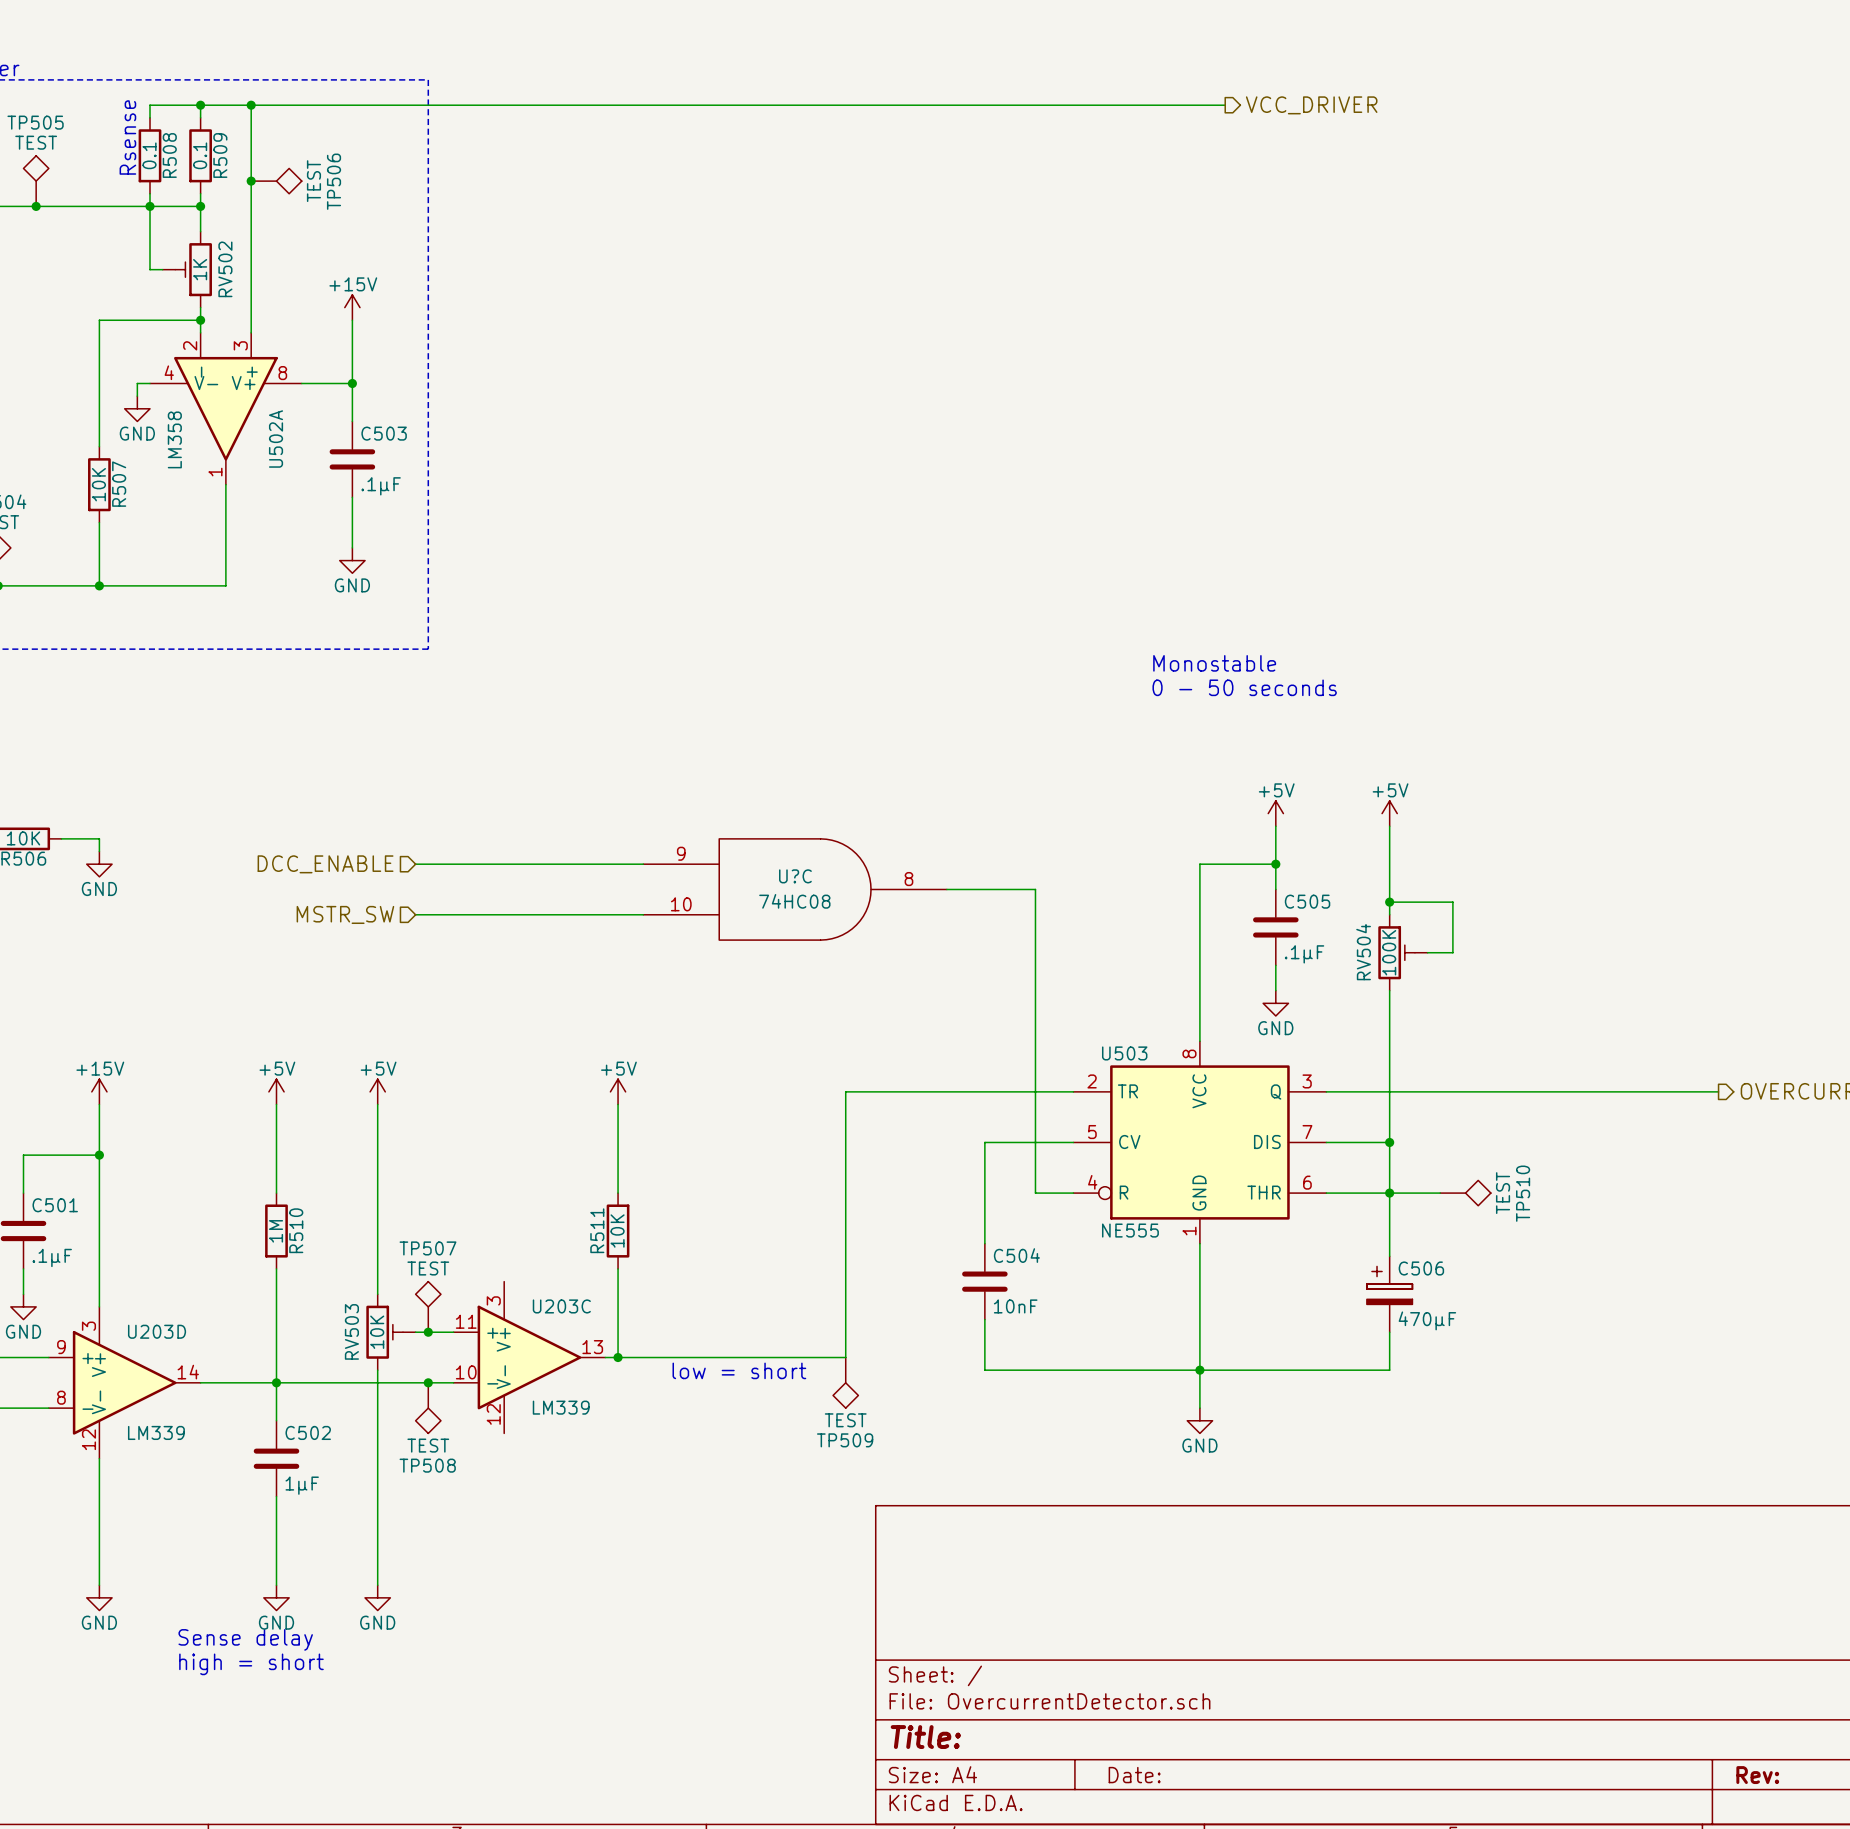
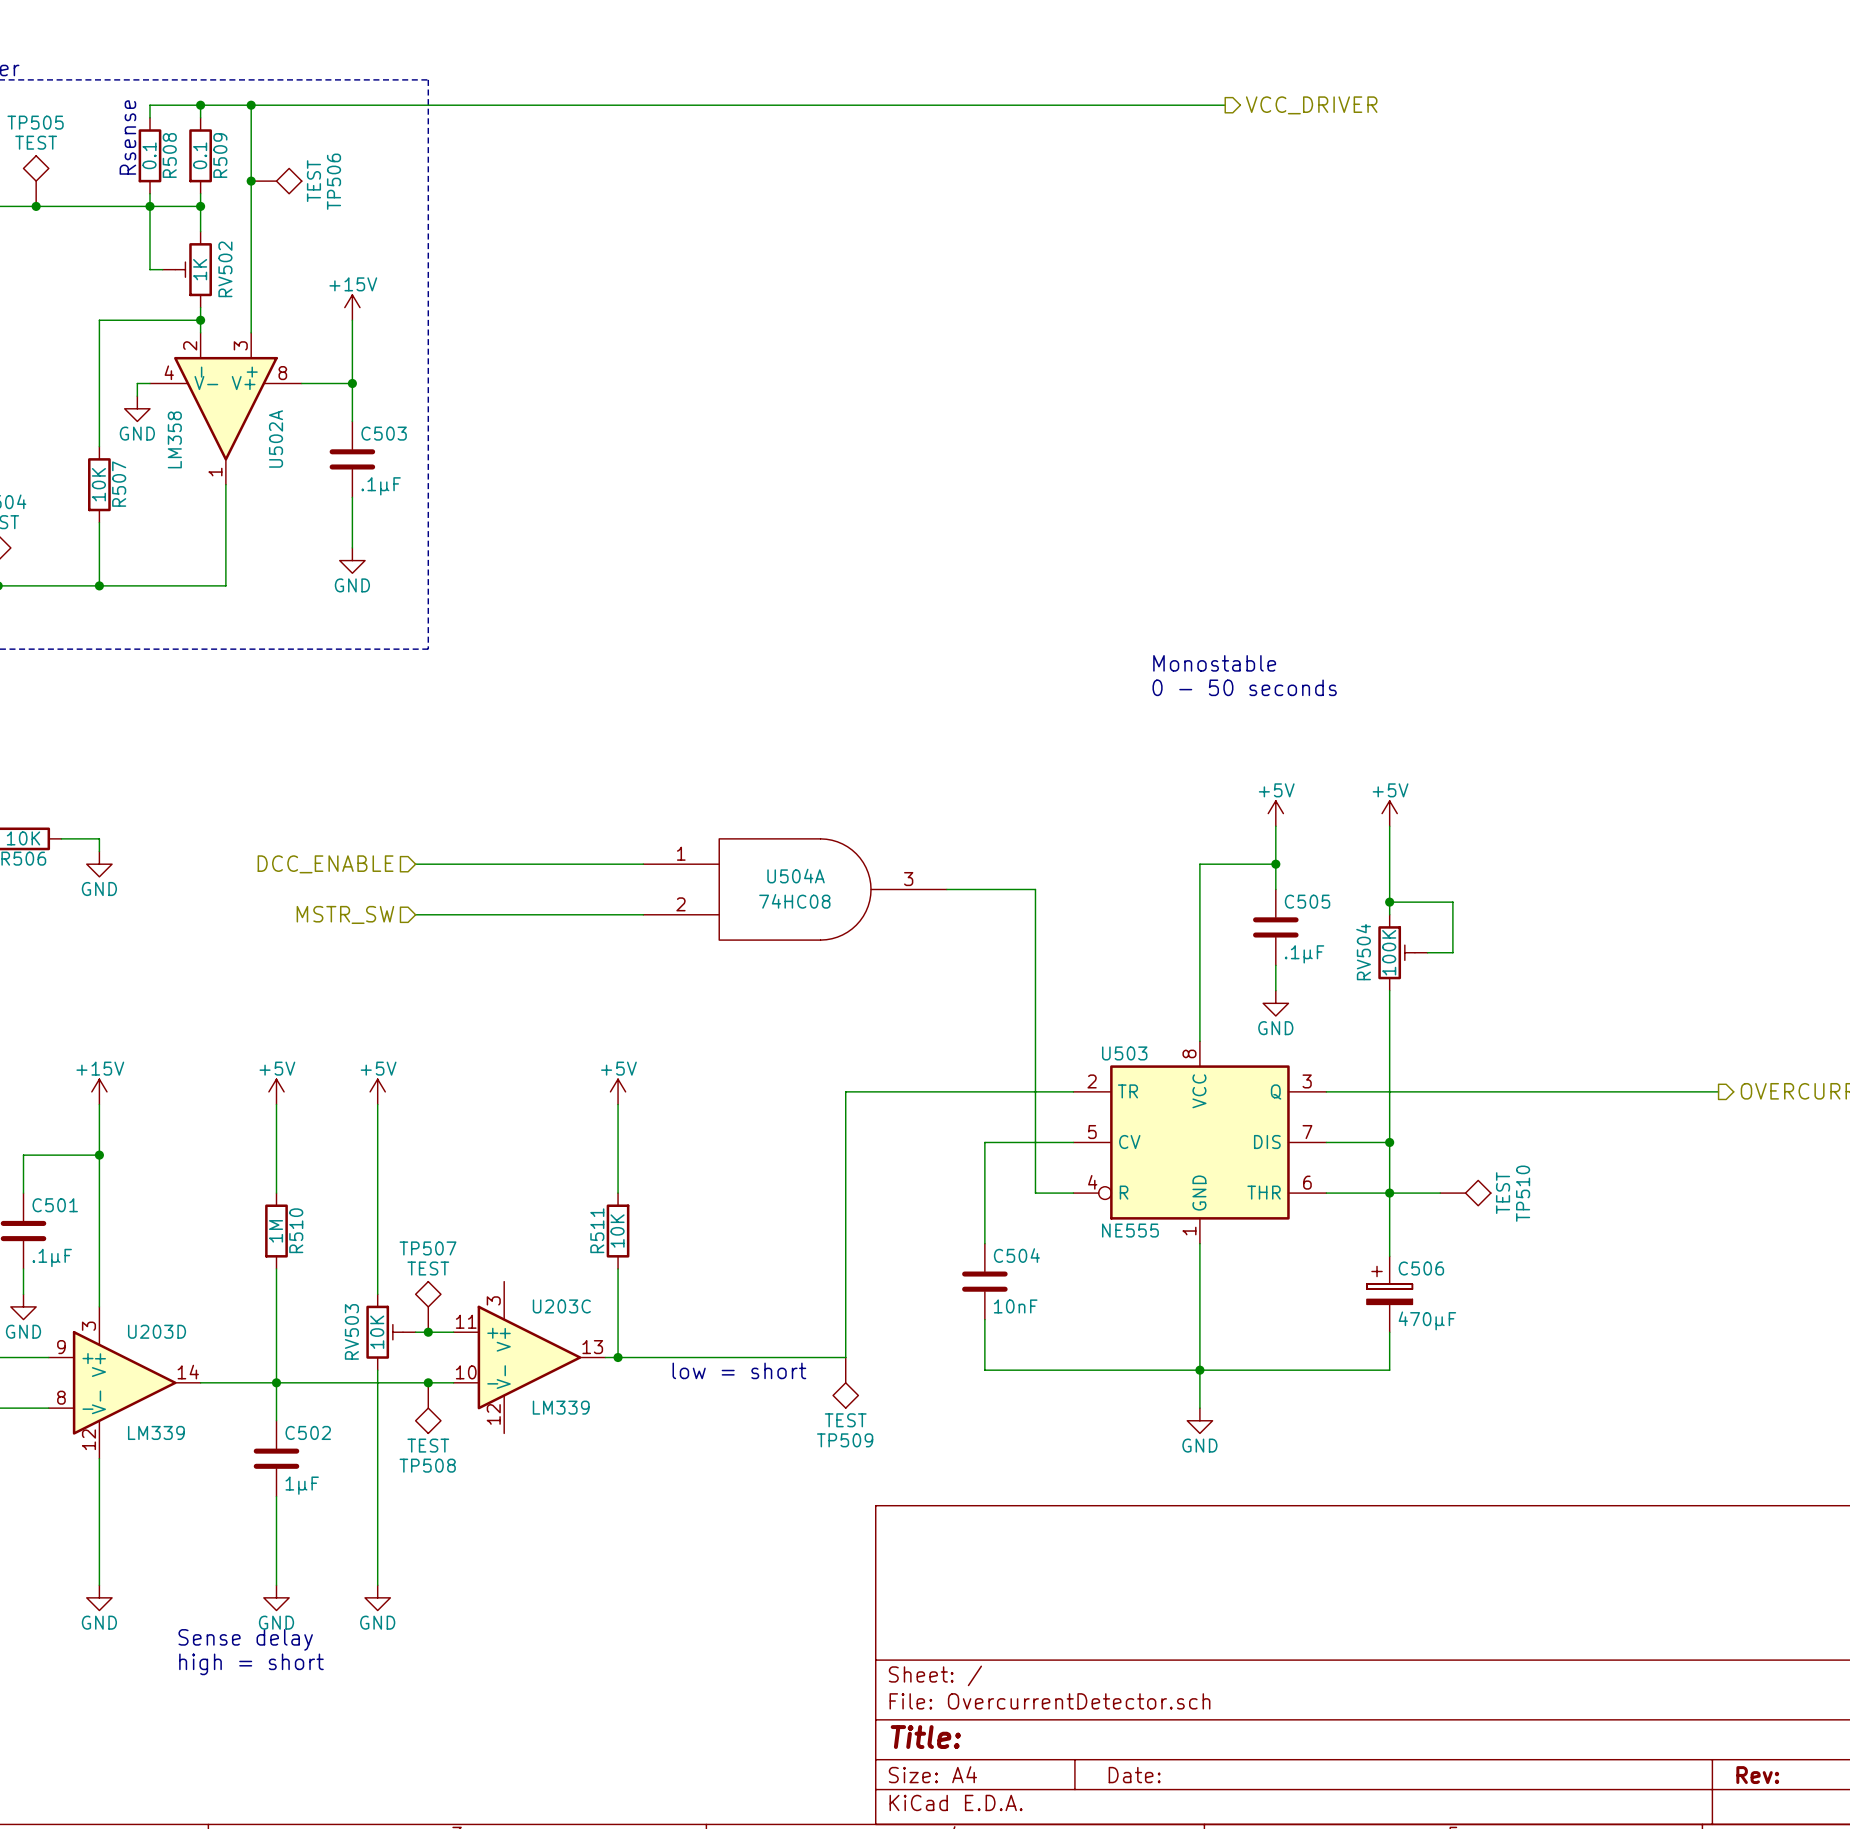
U?C pin number: 9 (681, 853) -> 1 (681, 853)
U?C name: U?C (795, 876) -> U504A (796, 876)
U?C pin number: 8 (908, 879) -> 3 (908, 879)
U?C pin number: 10 (681, 904) -> 2 (680, 904)

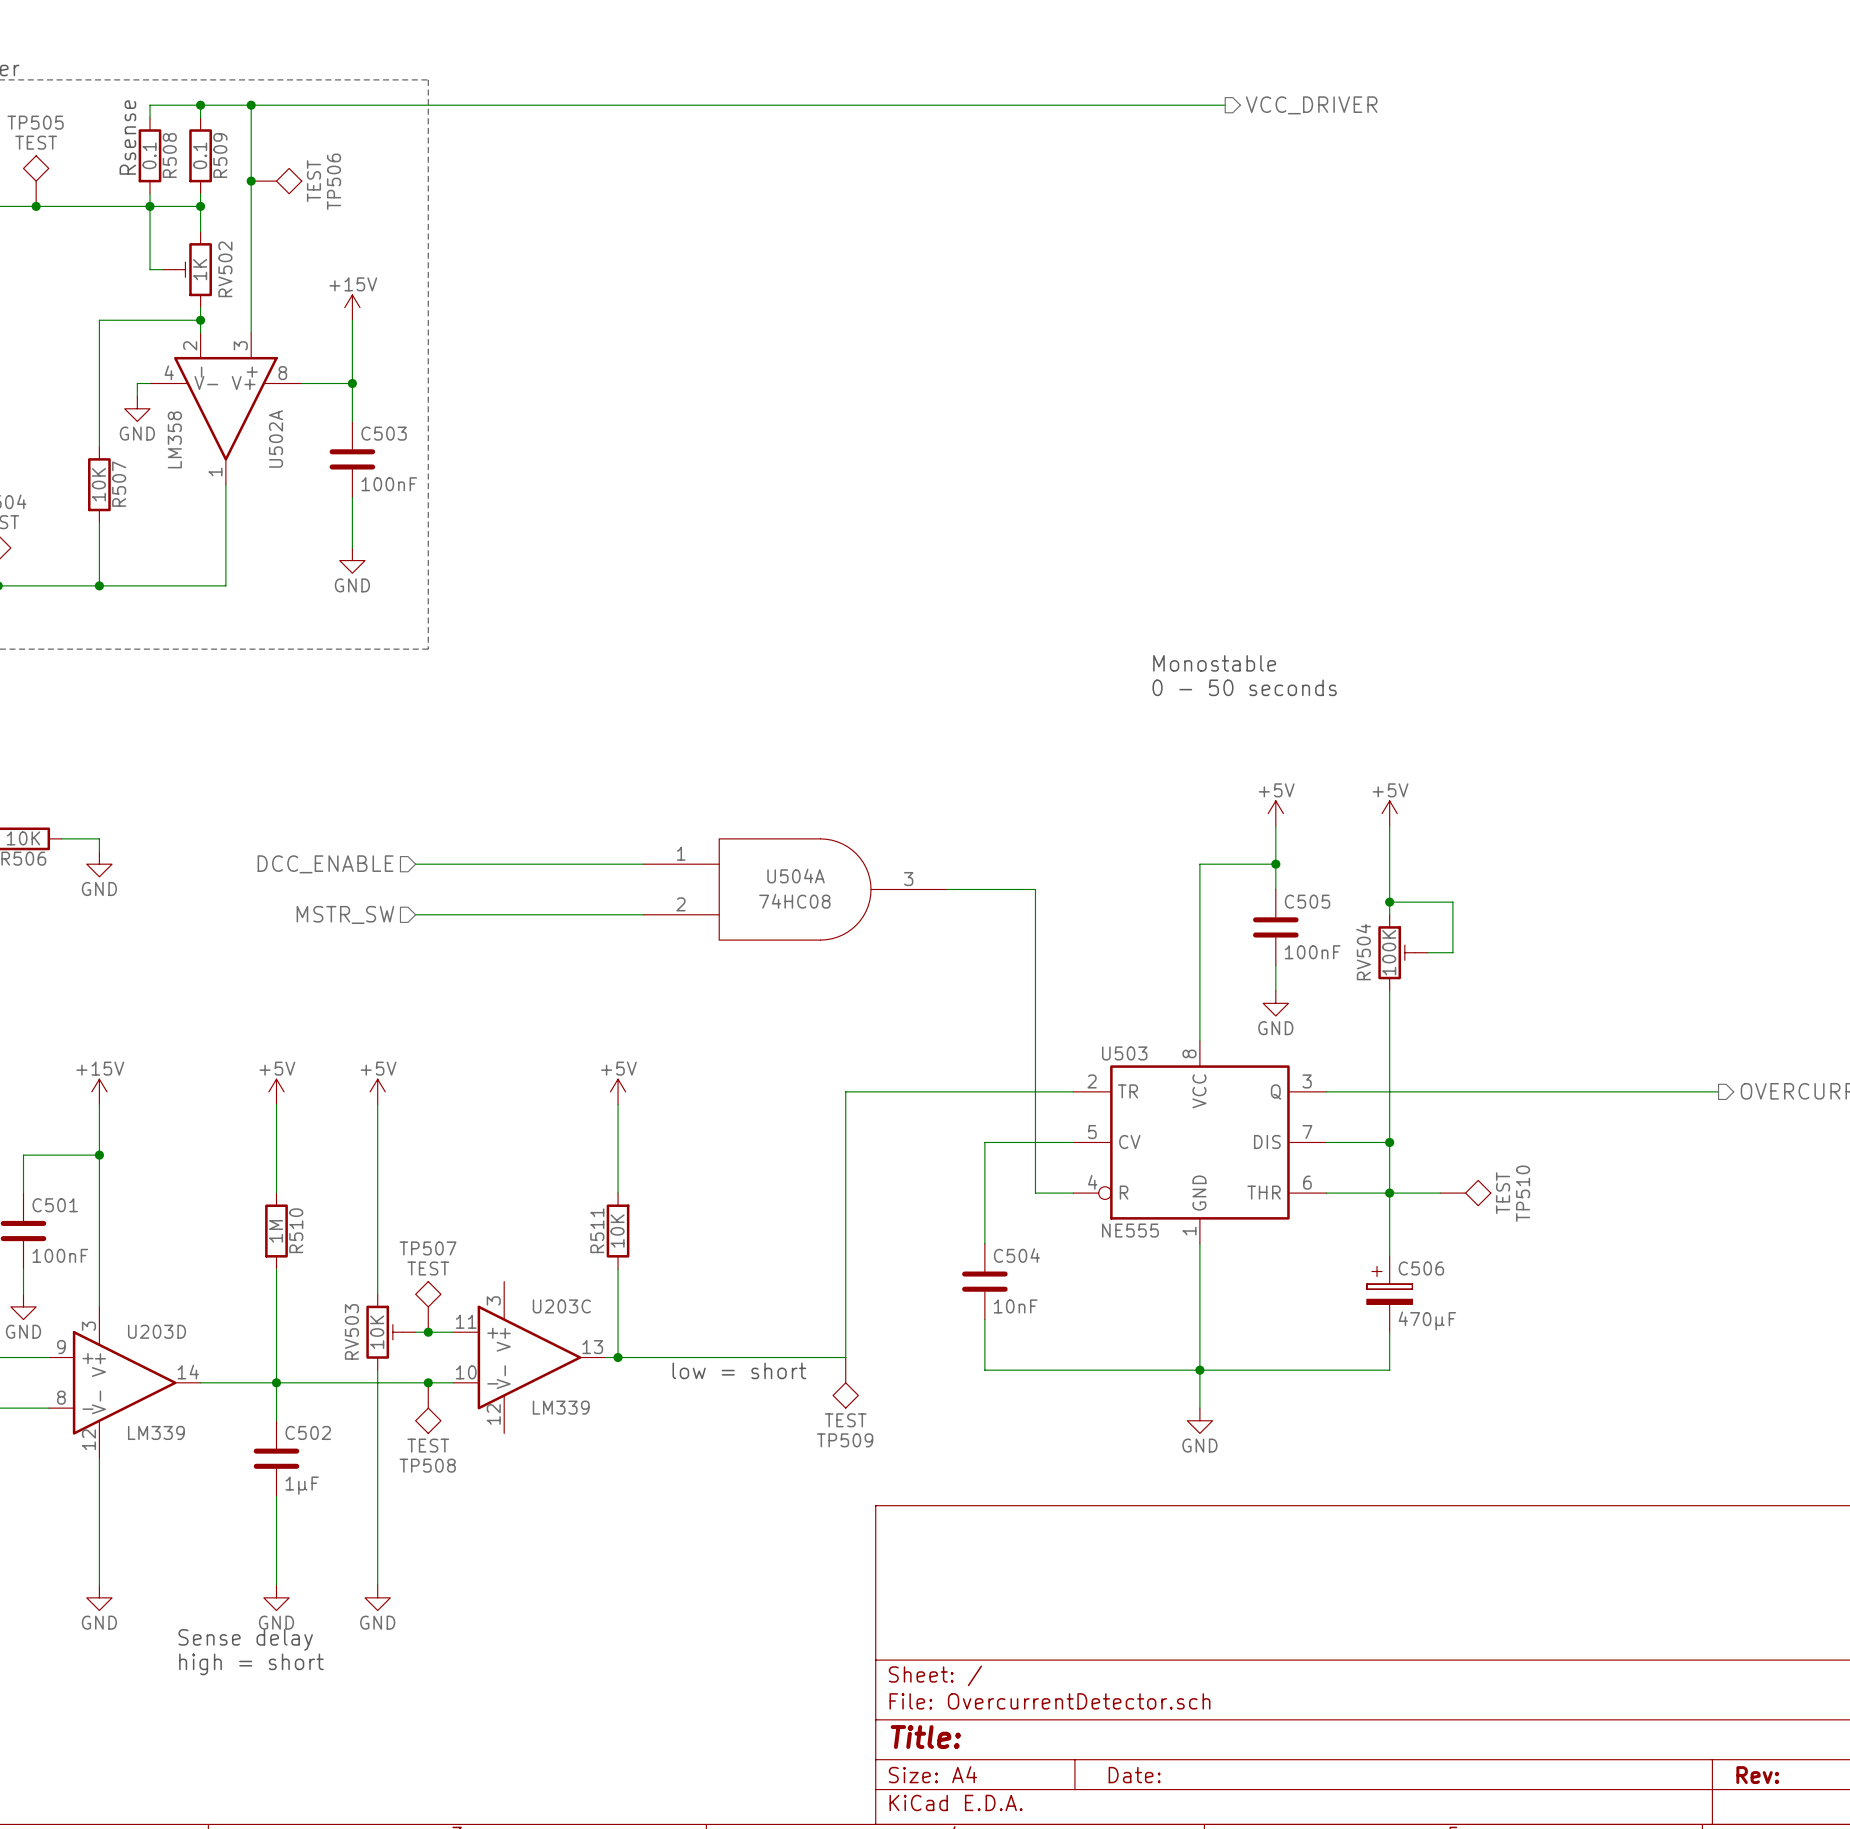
C503 value: .1µF (381, 486) -> 100nF (389, 484)
C505 value: .1µF (1304, 954) -> 100nF (1312, 952)
C501 value: .1µF (52, 1257) -> 100nF (60, 1255)

